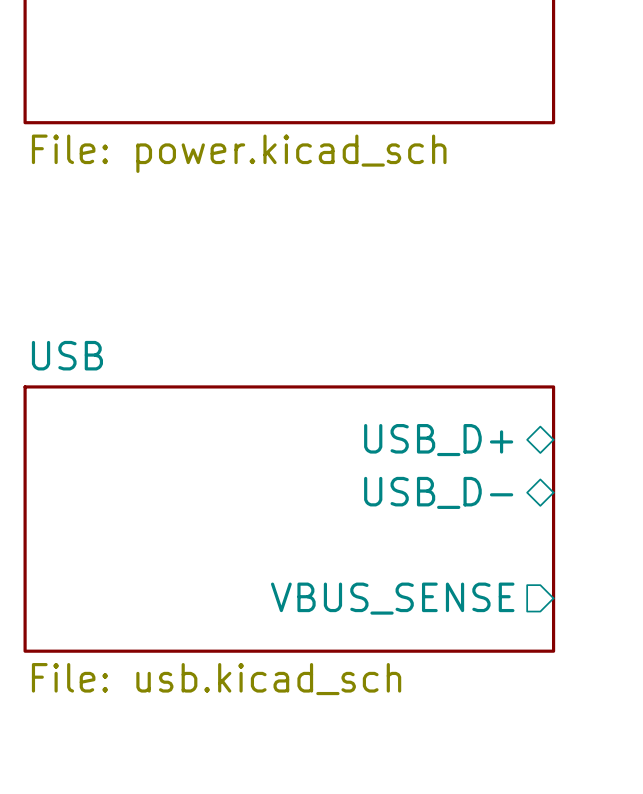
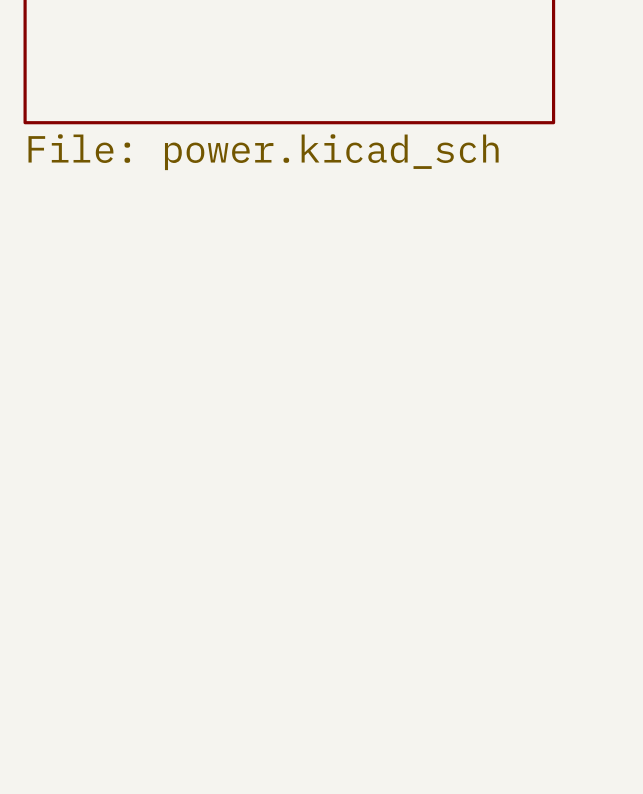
sheet pin: USB_D+ (438, 440) -> none
sheet pin: USB_D- (438, 492) -> none
sheet USB: File: usb.kicad_sch (289, 519) -> none
sheet pin: VBUS_SENSE (392, 598) -> none

